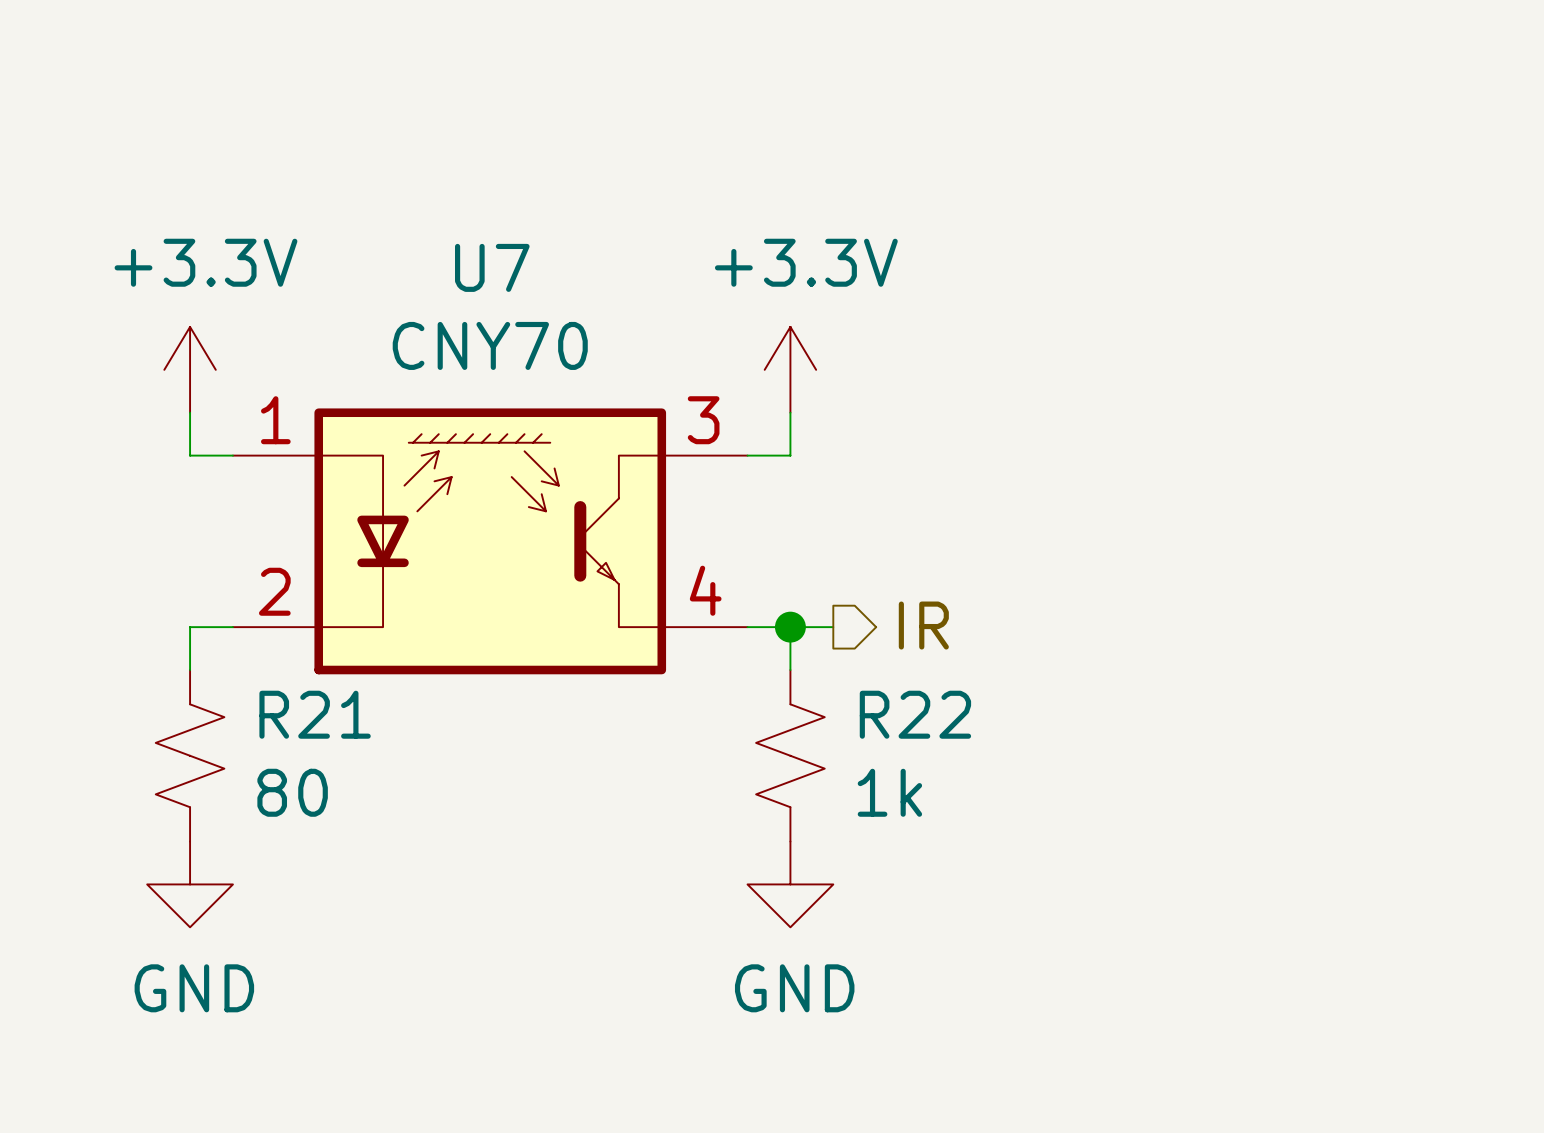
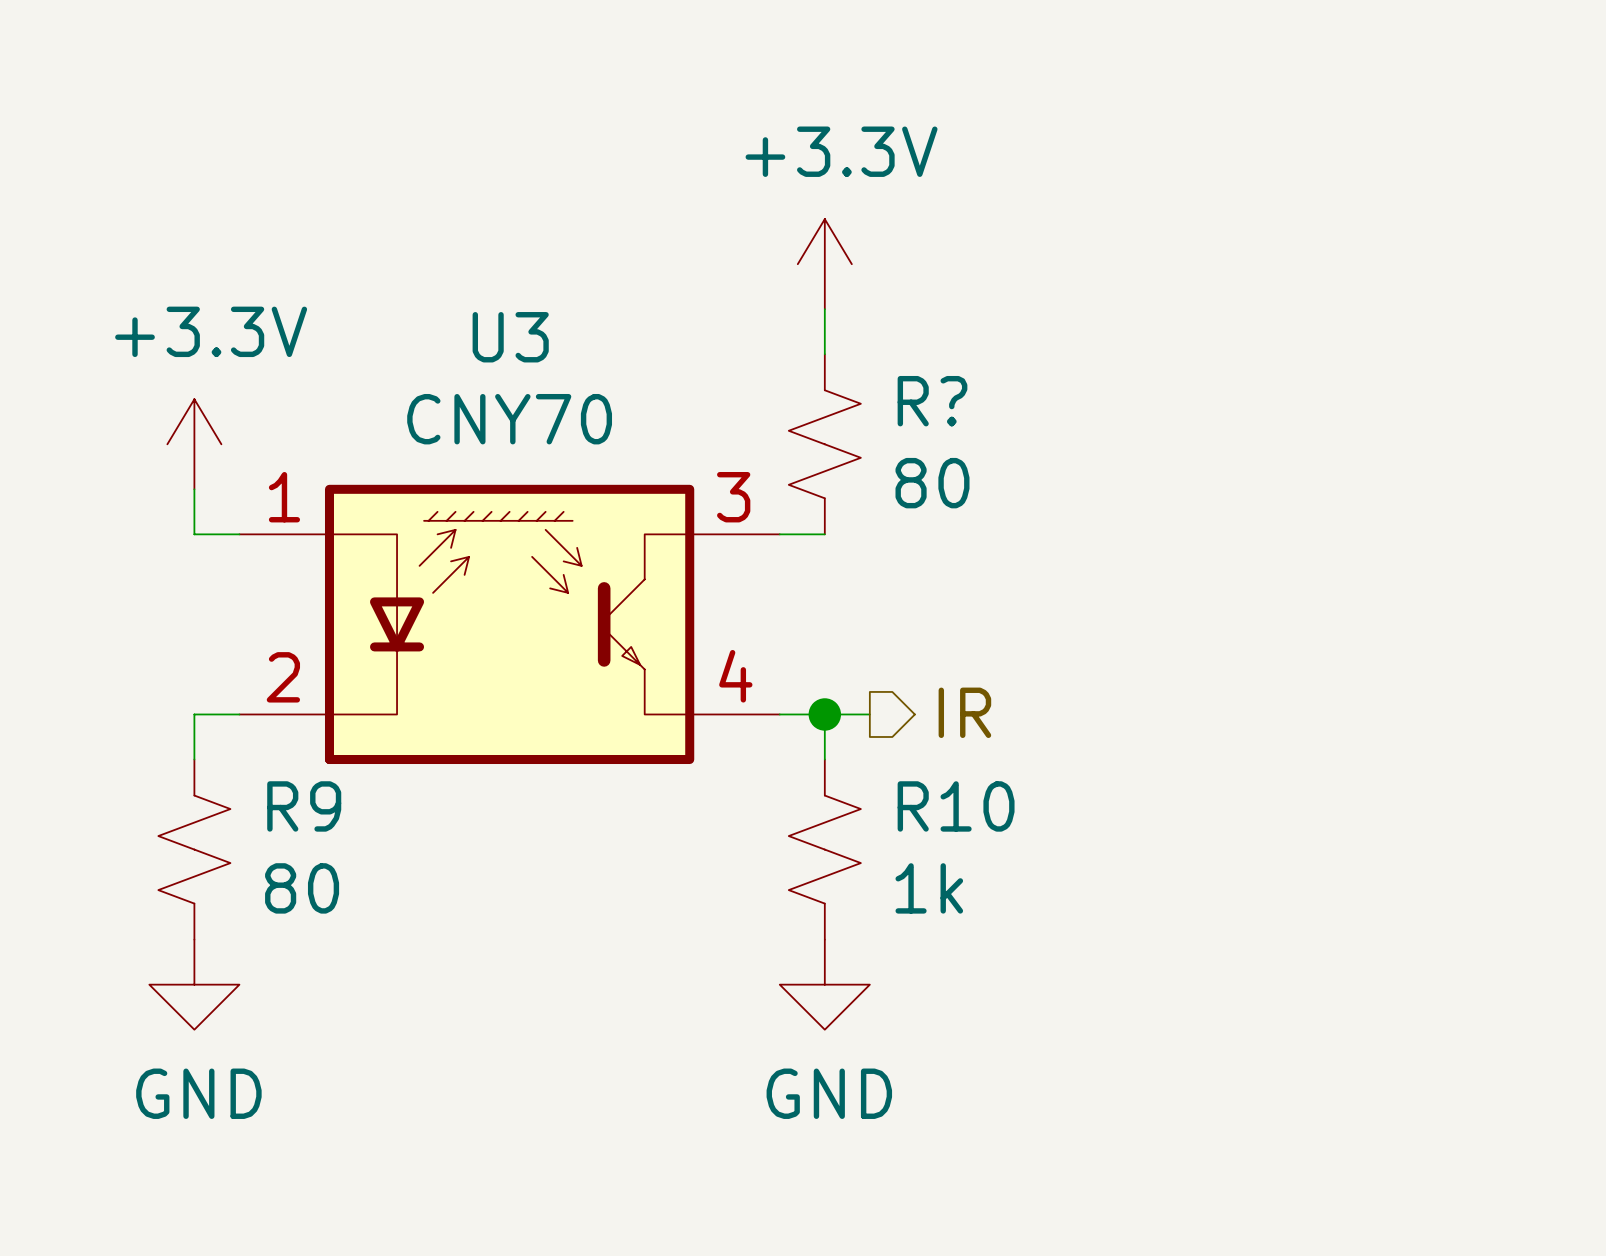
U7 name: U7 (492, 267) -> U3 (510, 337)
R?: none -> 80 (824, 444)
power symbol position: +3.3V (790, 369) -> +3.3V (824, 264)
R21 name: R21 (315, 714) -> R9 (304, 806)
R22 name: R22 (915, 714) -> R10 (956, 806)

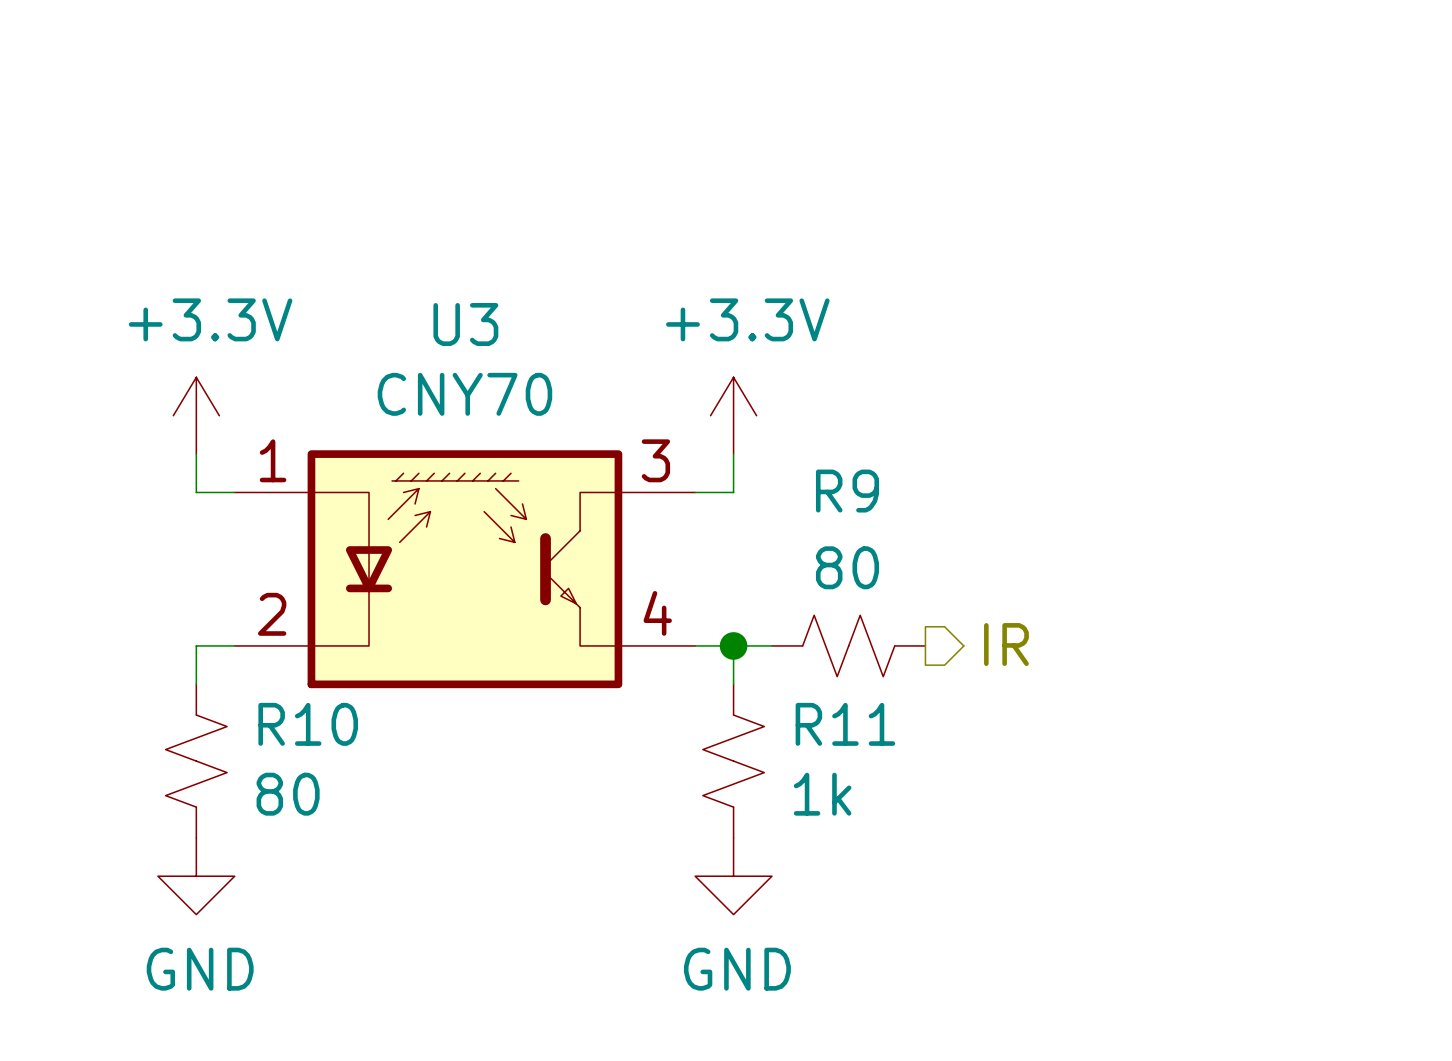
power symbol position: +3.3V (824, 264) -> +3.3V (733, 415)
R?: 80 (824, 444) -> none
hierarchical label position: IR (964, 712) -> IR (1006, 644)
R9: none -> 80 (848, 645)
R9 name: R9 (304, 806) -> R10 (308, 724)
R10 name: R10 (956, 806) -> R11 (845, 724)

